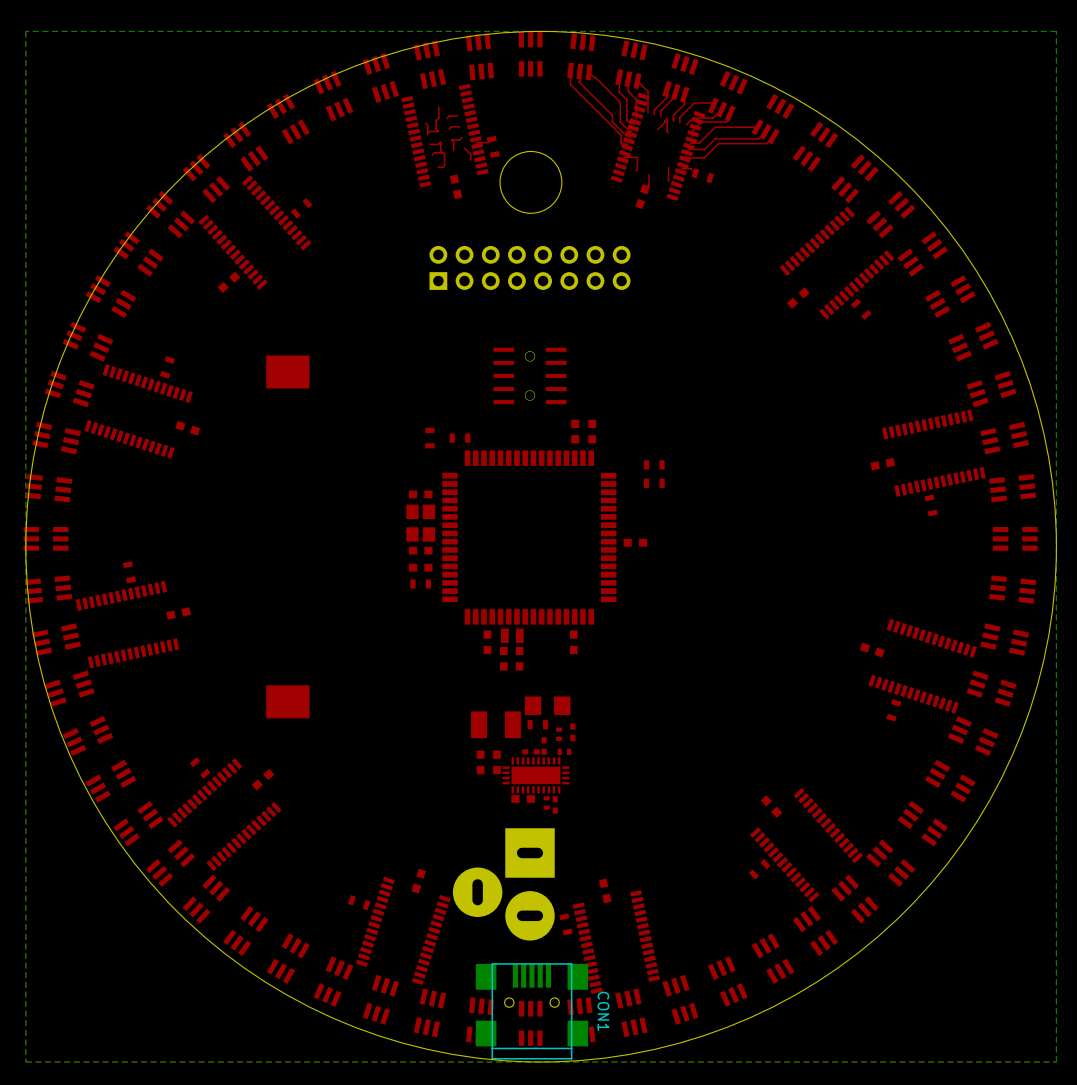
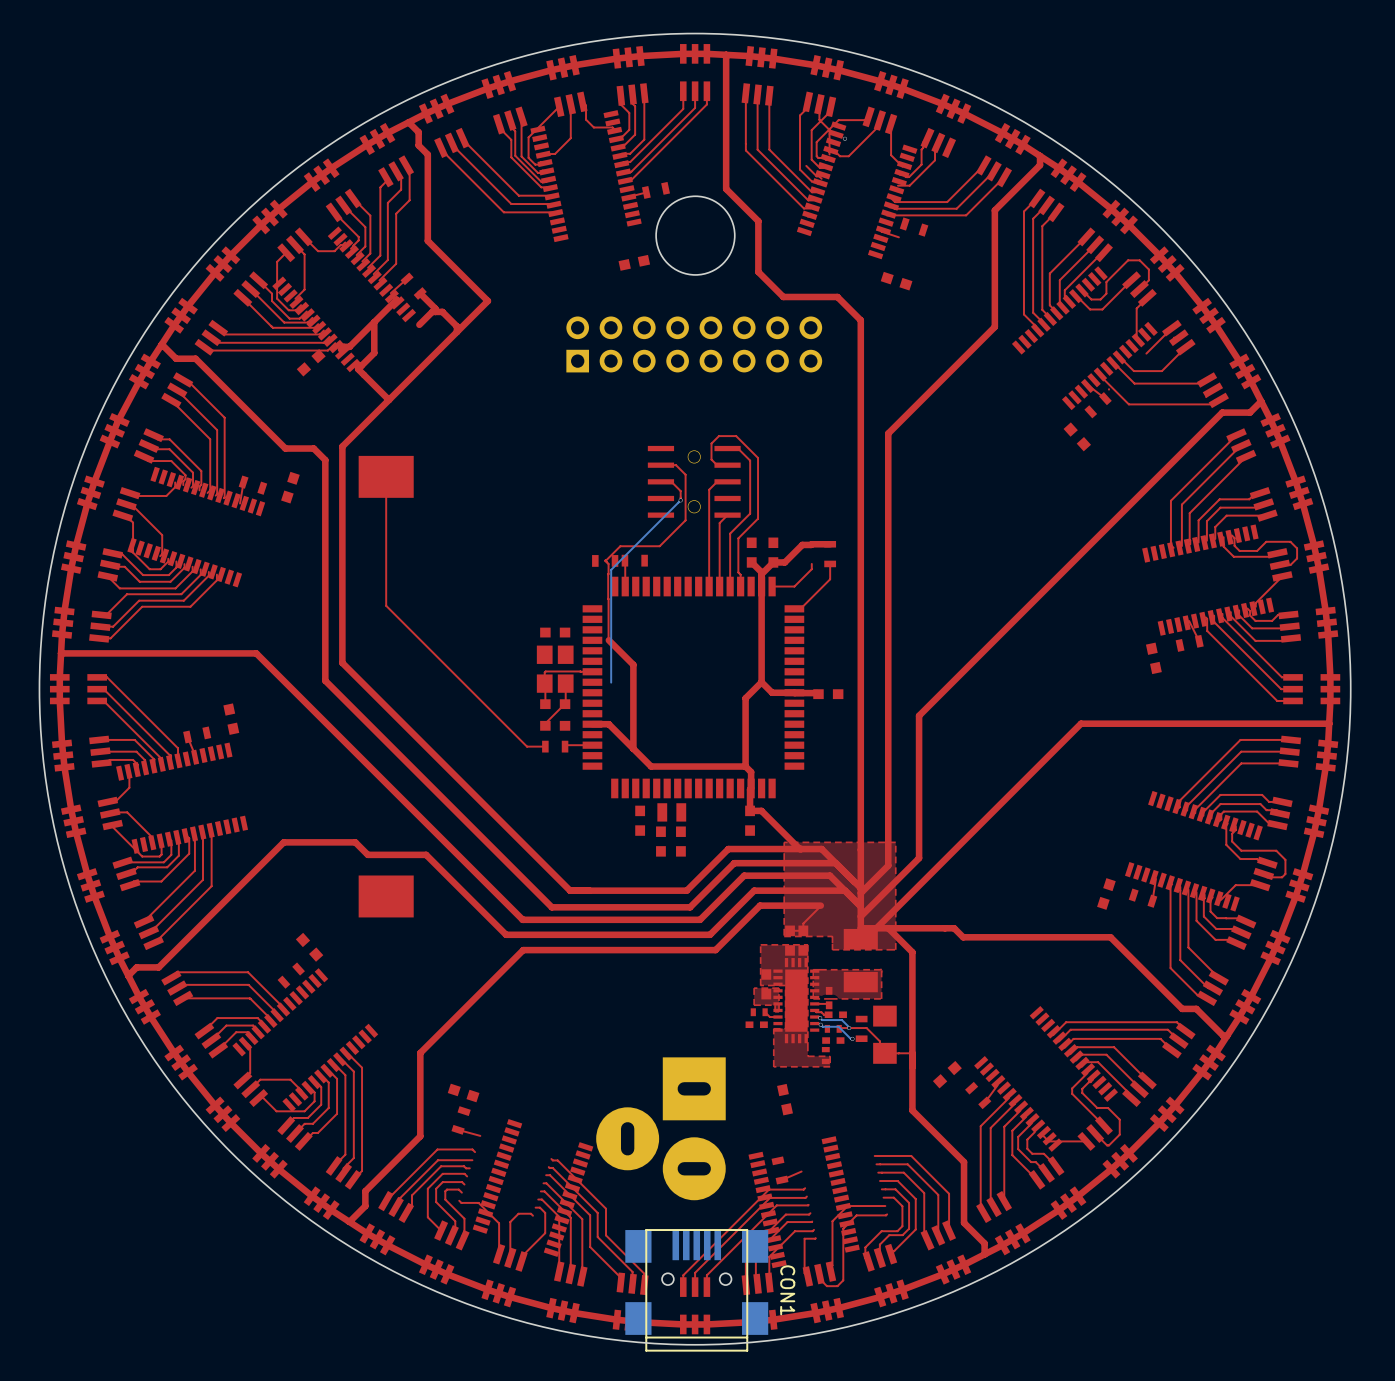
bottom zone outline: (1056, 31) (25, 31) (25, 1062) (1056, 1062) (1056, 31) -> none
top track: none -> (706, 53) (640, 56) (574, 65) (487, 88) (425, 113) (367, 144) (312, 182) (261, 224) (215, 272) (188, 306) (150, 361) (117, 422) (94, 481) (76, 545) (64, 611) (59, 677) (62, 743) (71, 809) (94, 896) (119, 958) (150, 1017) (188, 1072) (230, 1123) (278, 1169) (312, 1196) (367, 1233) (425, 1264) (487, 1289) (551, 1308) (616, 1319) (683, 1324) (749, 1322) (815, 1313) (902, 1289) (964, 1264) (1022, 1233) (1078, 1196) (1128, 1153) (1175, 1105) (1202, 1072) (1239, 1017) (1270, 958) (1295, 896) (1314, 832) (1325, 767) (1330, 700) (1328, 634) (1318, 568) (1295, 481) (1270, 419) (1239, 361) (1202, 306) (1159, 255) (1111, 209) (1078, 182) (1022, 144) (964, 113) (902, 88) (838, 70) (773, 58) (706, 53)
top track: none -> (726, 54) (726, 189) (758, 221) (758, 272) (783, 296) (837, 296) (860, 320) (860, 928) (954, 928) (963, 937) (1110, 937) (1182, 1008) (1196, 1008) (1223, 1035) (1227, 1035)
top track: none -> (683, 91) (683, 108) (630, 162) (622, 163)
top track: none -> (695, 91) (695, 107) (631, 171) (624, 171)
top track: none -> (706, 91) (706, 104) (631, 180) (625, 180)
top track: none -> (644, 93) (644, 139) (630, 153) (620, 155)
top track: none -> (632, 94) (632, 103) (635, 106) (635, 134) (622, 146) (618, 146)
top track: none -> (620, 95) (620, 104) (629, 112) (629, 129) (620, 138) (616, 138)
top track: (589, 72) (620, 102) (620, 122) (629, 131) (632, 131) -> (769, 95) (769, 149) (812, 192) (815, 192)
top track: none -> (582, 101) (586, 105) (586, 119) (593, 127) (612, 127) (615, 130)
top track: none -> (570, 104) (570, 138) (554, 153) (543, 153)
top track: none -> (559, 106) (528, 137) (528, 157) (535, 164) (545, 162)
top track: (579, 81) (612, 115) (612, 122) (618, 127) -> (757, 107) (757, 149) (808, 200) (813, 200)
top track: (619, 81) (619, 92) (626, 99) (626, 120) (634, 125) -> (807, 107) (800, 115) (800, 169) (811, 181) (818, 184)
top track: (637, 81) (648, 91) (648, 112) -> none
top track: (570, 84) (620, 135) (620, 142) (628, 144) -> (745, 111) (745, 150) (803, 208) (810, 208)
top track: none -> (830, 110) (811, 130) (811, 159) (819, 167) (823, 167)
top track: none -> (521, 116) (521, 156) (537, 172) (547, 170)
top track: (667, 89) (667, 97) (654, 110) (654, 114) -> (868, 116) (865, 120) (838, 120) (816, 142) (816, 156) (830, 159)
top track: none -> (510, 120) (510, 126) (515, 131) (515, 155) (541, 181) (546, 181) (549, 179)
top track: none -> (408, 122) (418, 132) (418, 145) (427, 154) (427, 240) (487, 301) (342, 446) (342, 662) (570, 890) (686, 890) (728, 849) (821, 849) (860, 888)
top track: none -> (499, 124) (499, 127) (511, 139) (511, 157) (541, 187) (550, 187)
top track: (675, 95) (660, 111) (660, 116) -> (879, 125) (848, 156) (839, 156) (835, 151) (828, 151)
top track: (684, 104) (673, 115) (673, 120) -> (891, 135) (891, 155) (902, 166)
top track: none -> (462, 138) (518, 195) (552, 195)
top track: (713, 105) (710, 103) (694, 103) (679, 117) (679, 123) -> (927, 138) (923, 142) (921, 149) (921, 164) (909, 177) (899, 174)
top track: (438, 106) (438, 118) (436, 120) (436, 129) (438, 131) (430, 131) (427, 133) (427, 125) (425, 123) -> none
via: none -> (844, 138)
top track: none -> (451, 142) (511, 204) (554, 204)
top track: (719, 112) (713, 118) (692, 118) (686, 125) -> (935, 146) (935, 160) (929, 165)
top track: none -> (441, 147) (503, 212) (556, 212)
top track: (727, 115) (726, 122) (701, 122) (692, 131) (692, 136) -> none
top track: (457, 116) (449, 116) (446, 118) -> none
top track: none -> (1040, 155) (1040, 165) (994, 210) (994, 326) (888, 433) (888, 865) (860, 893)
top track: (459, 126) (451, 126) (449, 129) -> none
top track: none -> (406, 165) (409, 168) (409, 200) (396, 213) (396, 263) (379, 280)
top track: (757, 127) (715, 127) -> (983, 165) (947, 202) (894, 202) (892, 199)
top track: (657, 129) (667, 118) (668, 132) -> none
top track: none -> (396, 171) (401, 176) (401, 189) (387, 202) (387, 260) (373, 274)
top track: none -> (385, 177) (385, 181) (380, 187) (380, 255) (368, 267)
top track: (462, 137) (459, 139) (451, 139) (453, 142) (453, 150) -> none
top track: (491, 139) (488, 142) (476, 142) -> none
top track: (758, 139) (715, 139) (704, 149) (688, 149) -> (984, 180) (956, 208) (889, 207)
top track: (766, 143) (718, 143) (704, 158) (688, 158) (685, 155) -> (995, 186) (966, 215) (886, 215)
top track: (430, 144) (438, 144) (440, 142) (440, 150) (444, 154) (444, 165) (437, 167) -> none
part rotation: 0° (493, 146) -> 90° clockwise (655, 190)
top track: (464, 148) (470, 154) (470, 160) -> none
top track: none -> (646, 192) (629, 196)
top track: (443, 152) (434, 152) (432, 155) -> none
top track: none -> (353, 198) (370, 215) (370, 253) (362, 261)
top track: none -> (1037, 198) (1023, 211) (1023, 314) (1038, 330)
top track: (623, 156) (637, 157) (636, 170) -> none
top track: none -> (343, 205) (365, 227) (365, 246) (356, 255)
top track: none -> (1042, 209) (1033, 218) (1033, 312) (1044, 324)
top track: none -> (334, 212) (358, 236) (358, 240) (350, 248)
top track: none -> (1056, 212) (1042, 226) (1042, 309) (1051, 318)
top track: (668, 167) (668, 180) -> none
top track: (681, 168) (690, 168) (695, 173) -> none
top track: (648, 174) (648, 185) (644, 189) -> none
top track: none -> (886, 231) (881, 231) (898, 237)
top track: none -> (303, 236) (318, 251) (334, 251) (345, 242)
top track: none -> (1086, 236) (1049, 273) (1049, 305) (1057, 313)
part rotation: 0° (456, 186) -> 90° clockwise (634, 262)
part position: (456, 186) -> (634, 262)
top track: none -> (295, 244) (304, 254) (304, 289) (295, 298)
top track: none -> (1095, 244) (1059, 280) (1059, 302) (1063, 307)
top track: none -> (286, 252) (277, 261) (277, 298) (288, 310) (295, 310) (301, 305)
top track: none -> (1103, 252) (1064, 290) (1064, 296) (1070, 301)
part rotation: 0° (642, 196) -> 90° clockwise (896, 281)
part position: (642, 196) -> (896, 281)
part rotation: 0° (301, 208) -> 90° clockwise (413, 286)
part position: (301, 208) -> (413, 286)
top track: none -> (407, 278) (390, 293)
top track: none -> (258, 280) (272, 293) (272, 301) (289, 318) (299, 318) (306, 311)
top track: none -> (1131, 280) (1102, 309) (1090, 309) (1076, 296)
top track: none -> (250, 289) (284, 322) (307, 322) (312, 317)
top track: none -> (1139, 289) (1148, 280) (1148, 269) (1139, 260) (1128, 260) (1106, 282) (1106, 293) (1100, 299) (1091, 299) (1082, 290)
top track: none -> (420, 293) (435, 308) (435, 311)
top track: none -> (242, 297) (271, 326)
top track: none -> (1147, 297) (1136, 308) (1136, 337) (1139, 340)
top track: none -> (396, 299) (349, 346) (343, 346) (341, 349)
top track: none -> (374, 322) (374, 353) (358, 369) (389, 399)
top track: none -> (318, 324) (314, 327) (271, 326)
top track: none -> (419, 324) (432, 311) (442, 311) (456, 326) (456, 332)
top track: none -> (218, 328) (224, 334) (319, 334) (323, 330)
top track: none -> (1171, 328) (1146, 353)
top track: none -> (329, 336) (323, 342) (216, 342) (211, 337)
top track: none -> (335, 343) (327, 350) (207, 350) (204, 347)
top track: none -> (161, 344) (176, 358) (195, 358) (285, 448) (313, 448) (325, 460) (325, 680) (551, 907) (690, 907) (734, 863) (835, 863)
top track: none -> (1185, 347) (1161, 371) (1133, 371) (1122, 360)
top track: none -> (1113, 362) (1134, 383) (1203, 383) (1207, 379)
top track: none -> (1101, 374) (1128, 404) (1211, 404) (1215, 400) (1218, 400)
top track: none -> (183, 379) (186, 379) (224, 417) (223, 498)
part rotation: 0° (798, 298) -> 90° clockwise (1077, 436)
part position: (798, 298) -> (1077, 436)
top track: none -> (1088, 385) (1105, 398)
top track: none -> (177, 390) (217, 430) (215, 495)
part rotation: 0° (861, 309) -> 90° clockwise (1098, 405)
part position: (861, 309) -> (1098, 405)
top track: none -> (171, 400) (210, 439) (210, 490) (207, 493)
top track: none -> (1261, 401) (1249, 412) (1222, 412) (919, 715) (919, 858) (860, 916)
top track: none -> (153, 435) (157, 439) (169, 439) (201, 471) (199, 490)
top track: none -> (1236, 435) (1170, 500) (1170, 545) (1173, 547)
top track: none -> (148, 445) (152, 449) (169, 449) (193, 472) (191, 487)
top track: none -> (1241, 445) (1181, 504) (1181, 546)
top track: none -> (727, 448) (738, 448) (750, 460) (750, 513) (730, 533) (730, 586)
top track: none -> (144, 456) (148, 461) (171, 461) (185, 475) (183, 485)
top track: none -> (1246, 456) (1189, 513) (1190, 544)
top track: none -> (660, 465) (676, 465) (685, 474) (685, 520) (659, 546) (620, 546) (605, 560) (608, 563) (608, 639) (633, 664) (633, 748)
top track: none -> (727, 465) (717, 465) (711, 459) (711, 443) (718, 436) (736, 436) (758, 457) (758, 518) (738, 538) (738, 572) (740, 574) (740, 586)
part rotation: 0° (167, 367) -> 90° clockwise (252, 485)
part position: (167, 367) -> (252, 485)
top track: none -> (386, 476) (386, 605) (527, 746) (545, 746)
top track: none -> (660, 481) (671, 481) (680, 491) (680, 500)
top track: none -> (727, 481) (717, 481) (709, 489) (709, 586)
top track: none -> (175, 482) (175, 487) (166, 495) (132, 495) (130, 493)
top track: none -> (243, 482) (240, 503)
top track: none -> (1260, 493) (1255, 493) (1249, 499) (1219, 499) (1198, 520) (1198, 542)
bottom track: none -> (680, 500) (611, 569) (611, 682)
via: none -> (680, 500)
top track: none -> (126, 504) (131, 504) (162, 535) (162, 554) (160, 556)
top track: none -> (1263, 504) (1259, 504) (1255, 507) (1220, 507) (1206, 521) (1206, 540)
top track: none -> (122, 515) (126, 515) (133, 522) (133, 552) (149, 569) (160, 569) (168, 561) (168, 558)
top track: none -> (727, 515) (719, 523) (719, 586)
top track: none -> (1267, 515) (1226, 515) (1215, 527) (1215, 539)
top track: none -> (1231, 535) (1234, 538) (1234, 545) (1239, 550) (1257, 550) (1266, 541) (1290, 541) (1297, 548) (1297, 558) (1290, 564) (1279, 564)
top track: none -> (1223, 537) (1223, 546) (1233, 556) (1269, 556) (1272, 553) (1277, 553)
top track: none -> (830, 544) (802, 544) (784, 562) (773, 562) (761, 574)
part rotation: 0° (187, 428) -> 90° clockwise (290, 487)
part position: (187, 428) -> (290, 487)
top track: none -> (112, 553) (122, 554) (143, 575) (168, 575) (176, 567) (176, 561)
part: none -> (830, 554)
top track: none -> (624, 560) (625, 586)
part rotation: 0° (429, 438) -> 90° clockwise (634, 560)
part position: (429, 438) -> (634, 560)
top track: none -> (751, 562) (761, 572) (761, 682)
top track: none -> (184, 564) (184, 567) (170, 581) (139, 581) (124, 566) (112, 566) (110, 564)
top track: none -> (811, 563) (811, 569) (794, 586) (772, 586)
top track: none -> (830, 563) (830, 579) (800, 608) (794, 608)
top track: none -> (192, 566) (192, 571) (175, 588) (119, 588) (107, 576)
top track: none -> (200, 569) (200, 574) (181, 594) (126, 594) (106, 614) (101, 614)
top track: none -> (208, 571) (208, 575) (183, 600) (139, 600) (113, 626) (100, 626)
top track: none -> (216, 574) (216, 580) (190, 606) (142, 606) (110, 638) (99, 638)
top track: none -> (1282, 576) (1255, 603) (1255, 606)
part: (654, 464) -> none
part rotation: 0° (882, 464) -> 90° clockwise (1153, 658)
part position: (882, 464) -> (1153, 658)
top track: none -> (1247, 608) (1250, 611) (1250, 615) (1255, 620) (1272, 620) (1278, 614) (1288, 614)
top track: none -> (1239, 610) (1239, 615) (1252, 628) (1288, 628) (1289, 626)
top track: none -> (1230, 612) (1230, 616) (1255, 640) (1283, 640) (1286, 638) (1290, 638)
top track: none -> (1222, 613) (1222, 617) (1281, 677) (1293, 677)
top track: none -> (1214, 615) (1214, 622) (1281, 689) (1293, 689)
top track: none -> (1205, 617) (1207, 630) (1277, 700) (1293, 700)
part: (654, 483) -> none
top track: none -> (1189, 620) (1199, 641)
part rotation: 0° (931, 505) -> 90° clockwise (1189, 643)
top track: none -> (61, 653) (256, 653) (522, 919) (700, 919) (744, 875) (829, 875) (860, 906)
top track: none -> (592, 671) (545, 671) (545, 704)
top track: none -> (97, 677) (107, 677) (178, 748) (179, 760)
top track: none -> (761, 682) (745, 698) (745, 766)
top track: none -> (761, 682) (772, 692) (818, 694)
top track: none -> (565, 683) (565, 703) (545, 723) (545, 725)
top track: none -> (97, 689) (103, 689) (171, 755) (171, 762)
round board edge position: (541, 546) -> (695, 689)
top track: none -> (97, 700) (103, 700) (162, 759) (162, 764)
top track: none -> (592, 724) (608, 724) (651, 766) (745, 766)
top track: none -> (1329, 723) (1081, 723) (876, 928)
part rotation: 0° (129, 572) -> 90° clockwise (197, 734)
top track: none -> (187, 737) (196, 757)
top track: none -> (99, 739) (134, 739) (154, 759) (154, 766)
top track: none -> (1290, 739) (1240, 739) (1179, 800) (1179, 807)
top track: none -> (592, 745) (565, 746)
top track: none -> (100, 751) (136, 751) (144, 759) (146, 768)
top track: none -> (1289, 751) (1241, 751) (1187, 805) (1187, 810)
top track: none -> (101, 763) (106, 763) (109, 759) (133, 759) (137, 764) (137, 769)
top track: none -> (1288, 763) (1241, 763) (1195, 809) (1195, 813)
top track: none -> (745, 766) (751, 772) (750, 810) (761, 810) (799, 849)
top track: none -> (129, 771) (129, 787) (115, 801) (107, 801)
part rotation: 0° (178, 613) -> 90° clockwise (231, 719)
part position: (178, 613) -> (231, 719)
top track: none -> (1282, 801) (1269, 801) (1262, 794) (1220, 794) (1203, 812) (1203, 815)
top track: none -> (110, 813) (127, 812) (152, 837) (153, 842)
top track: none -> (1279, 813) (1276, 810) (1266, 810) (1260, 804) (1220, 804) (1211, 813) (1211, 818)
top track: none -> (1219, 821) (1223, 811) (1257, 811) (1270, 825) (1277, 825)
top track: none -> (1227, 823) (1226, 844) (1240, 859) (1257, 859) (1260, 862) (1267, 862)
top track: none -> (112, 825) (142, 856) (159, 856) (161, 854) (161, 841)
top track: none -> (1235, 826) (1235, 830) (1232, 833) (1232, 841) (1241, 850) (1276, 850) (1285, 859) (1285, 874) (1282, 877) (1267, 877) (1263, 873)
top track: none -> (211, 830) (211, 886) (153, 943)
part rotation: 0° (872, 650) -> 90° clockwise (1106, 894)
part position: (872, 650) -> (1106, 894)
top track: none -> (203, 832) (203, 879) (148, 932)
top track: none -> (194, 834) (194, 870) (144, 921)
top track: none -> (186, 835) (189, 838) (189, 853) (161, 881) (133, 881) (130, 885)
top track: none -> (178, 837) (178, 855) (167, 867) (137, 867) (131, 873) (126, 873)
top track: none -> (169, 839) (171, 854) (163, 862) (122, 862)
top zone outline: none -> (895, 842) (895, 949) (832, 949) (832, 936) (784, 936) (784, 842) (895, 842)
top track: none -> (1155, 878) (1152, 901)
top track: none -> (1172, 884) (1170, 885) (1170, 968) (1197, 995) (1203, 995) (1207, 998)
top track: none -> (1260, 885) (1235, 885) (1220, 900)
top track: none -> (1180, 886) (1180, 960) (1208, 988) (1212, 988)
top track: none -> (1188, 889) (1188, 947) (1218, 977)
top track: none -> (844, 890) (754, 890) (710, 934) (506, 934) (426, 854) (367, 854) (355, 842) (283, 842) (158, 967) (136, 967) (128, 975)
top track: none -> (1196, 892) (1196, 920) (1215, 939) (1233, 939) (1236, 943)
top track: none -> (1204, 894) (1203, 916) (1216, 928) (1237, 928) (1241, 932)
top track: none -> (1212, 897) (1210, 899) (1210, 911) (1217, 918) (1225, 918)
part rotation: 0° (547, 705) -> 90° clockwise (884, 1034)
part position: (547, 705) -> (884, 1034)
part rotation: 0° (893, 710) -> 90° clockwise (1143, 898)
top track: none -> (1226, 918) (1242, 918) (1246, 921)
part rotation: 0° (495, 724) -> 90° clockwise (860, 960)
part position: (495, 724) -> (860, 960)
part: (537, 724) -> none
top track: none -> (888, 928) (912, 952) (912, 1110) (964, 1162) (964, 1222) (984, 1243) (984, 1254)
top track: none -> (790, 930) (803, 930) (803, 923) (820, 905) (760, 905) (715, 950) (523, 950) (420, 1053) (420, 1136) (365, 1191) (365, 1206) (348, 1221)
part: (572, 732) -> none
part: (559, 734) -> none
part: none -> (790, 940)
part: none -> (803, 940)
top zone outline: none -> (807, 944) (807, 1056) (830, 1056) (830, 1066) (773, 1066) (773, 1028) (785, 1028) (785, 985) (760, 985) (760, 944) (807, 944)
part: (544, 745) -> none
part: (530, 751) -> none
part: (564, 751) -> none
top zone outline: none -> (881, 968) (881, 998) (813, 998) (813, 969) (881, 968)
part: (480, 762) -> none
part: (496, 762) -> none
top track: none -> (171, 977) (177, 972) (248, 972) (285, 1009)
part rotation: 0° (200, 767) -> 90° clockwise (291, 975)
part position: (200, 767) -> (291, 975)
part: none -> (766, 984)
top track: none -> (177, 988) (180, 984) (248, 984) (279, 1015)
top zone outline: none -> (779, 988) (779, 1011) (775, 1011) (775, 1005) (754, 1005) (754, 988) (779, 988)
part rotation: 0° (535, 775) -> 90° clockwise (796, 1000)
part position: (535, 775) -> (796, 1000)
part rotation: 0° (263, 779) -> 90° clockwise (309, 947)
part position: (263, 779) -> (309, 947)
top track: none -> (183, 998) (250, 998)
part: none -> (829, 998)
top track: none -> (250, 998) (272, 1021)
top track: none -> (814, 1003) (829, 1005)
top track: none -> (814, 1010) (828, 1014)
part: none -> (759, 1012)
top track: none -> (765, 1012) (769, 1017) (777, 1017)
part: none -> (835, 1014)
bottom track: none -> (820, 1018) (822, 1020) (841, 1020) (849, 1028)
via: none -> (820, 1018)
part: (523, 799) -> none
part: (546, 802) -> none
bottom track: none -> (820, 1024) (822, 1026) (838, 1026) (852, 1038)
via: none -> (820, 1024)
top track: none -> (266, 1026) (257, 1018) (217, 1018) (204, 1031)
part rotation: 0° (555, 804) -> 90° clockwise (756, 1024)
part position: (555, 804) -> (756, 1024)
part: none -> (833, 1028)
top track: none -> (839, 1028) (866, 1028) (879, 1041) (879, 1048) (884, 1053) (912, 1053)
via: none -> (849, 1028)
part: none -> (861, 1028)
part rotation: 0° (771, 806) -> 90° clockwise (947, 1074)
part position: (771, 806) -> (947, 1074)
top track: none -> (1185, 1031) (1176, 1022) (1066, 1022) (1053, 1035)
top track: none -> (260, 1032) (253, 1025) (226, 1025) (211, 1040)
top track: none -> (253, 1038) (247, 1032) (236, 1032) (218, 1050)
via: none -> (852, 1038)
part: none -> (833, 1040)
top track: none -> (1178, 1040) (1167, 1029) (1070, 1029) (1058, 1041)
top track: none -> (247, 1044) (250, 1046) (250, 1073) (242, 1080)
top track: none -> (1064, 1047) (1073, 1038) (1160, 1038) (1171, 1050)
top track: none -> (348, 1053) (362, 1067) (362, 1170) (353, 1179)
top track: none -> (1070, 1054) (1077, 1047) (1114, 1047) (1147, 1080)
part: none -> (825, 1055)
top track: none -> (341, 1059) (353, 1071) (353, 1158) (343, 1168) (343, 1172)
top track: none -> (1076, 1060) (1081, 1054) (1106, 1054) (1139, 1089)
top track: none -> (335, 1065) (345, 1075) (345, 1154) (334, 1165)
top track: none -> (1081, 1066) (1086, 1062) (1098, 1062) (1131, 1098)
top track: none -> (329, 1071) (337, 1078) (337, 1113) (317, 1132) (312, 1132) (303, 1141)
top track: none -> (1087, 1073) (1072, 1088) (1072, 1093) (1103, 1125)
top track: none -> (322, 1076) (328, 1082) (328, 1107) (312, 1123) (304, 1123) (295, 1133)
top track: none -> (1093, 1079) (1082, 1088) (1082, 1093) (1097, 1107) (1108, 1107) (1119, 1119) (1119, 1134) (1108, 1145) (1095, 1133)
top track: none -> (316, 1082) (321, 1087) (321, 1104) (307, 1117) (293, 1117) (286, 1125)
top track: none -> (997, 1085) (984, 1102)
top track: none -> (310, 1088) (314, 1092) (314, 1101) (304, 1111) (276, 1111) (263, 1098) (258, 1098)
top track: none -> (250, 1089) (260, 1079) (290, 1079) (303, 1093)
top track: none -> (1009, 1097) (980, 1126) (980, 1209) (983, 1212)
top track: none -> (1014, 1104) (990, 1127) (990, 1203) (994, 1206)
part rotation: 0° (759, 869) -> 90° clockwise (978, 1095)
top track: none -> (1020, 1110) (1004, 1126) (1004, 1201)
top track: none -> (1026, 1116) (1012, 1130) (1012, 1155) (1037, 1179)
top track: none -> (1031, 1123) (1018, 1136) (1018, 1149) (1031, 1162) (1035, 1162) (1046, 1172)
part rotation: 0° (418, 881) -> 90° clockwise (463, 1093)
part position: (418, 881) -> (463, 1093)
top track: none -> (458, 1129) (480, 1135)
top track: none -> (1034, 1132) (1027, 1139) (1027, 1148) (1032, 1153) (1043, 1153) (1056, 1165)
top track: none -> (1043, 1135) (1048, 1141) (1086, 1141)
part position: (605, 890) -> (785, 1099)
top track: none -> (475, 1152) (472, 1149) (437, 1149) (385, 1201)
part rotation: 0° (359, 902) -> 90° clockwise (461, 1120)
part position: (359, 902) -> (461, 1120)
top track: none -> (874, 1155) (911, 1155) (949, 1193) (949, 1230)
top track: none -> (551, 1159) (557, 1160) (606, 1208) (606, 1235) (644, 1273) (644, 1285)
top track: none -> (472, 1160) (438, 1160) (400, 1197) (400, 1202) (396, 1206)
top track: none -> (876, 1164) (907, 1164) (938, 1194) (938, 1235)
top track: none -> (548, 1167) (552, 1167) (597, 1212) (597, 1237) (632, 1271) (632, 1283)
top track: none -> (469, 1168) (464, 1166) (441, 1166) (411, 1195) (411, 1207) (406, 1212)
top track: none -> (801, 1171) (782, 1180)
top track: none -> (878, 1172) (903, 1172) (924, 1193) (924, 1236) (927, 1240)
top track: none -> (546, 1175) (549, 1175) (590, 1215) (590, 1247) (620, 1277) (620, 1282)
top track: none -> (467, 1176) (464, 1173) (442, 1173) (427, 1188) (427, 1217) (441, 1230)
part position: (565, 924) -> (780, 1170)
top track: none -> (880, 1181) (897, 1181) (915, 1199) (915, 1229) (891, 1254)
top track: none -> (543, 1183) (546, 1183) (582, 1219) (582, 1276)
top track: none -> (464, 1184) (462, 1182) (442, 1182) (436, 1188) (436, 1202) (455, 1221) (451, 1235)
top track: none -> (805, 1188) (769, 1189) (683, 1275) (683, 1287)
top track: none -> (881, 1189) (895, 1189) (909, 1202) (909, 1228) (902, 1235) (889, 1235) (879, 1244) (879, 1257)
top track: none -> (540, 1191) (544, 1191) (570, 1217) (570, 1274)
top track: none -> (461, 1192) (458, 1189) (446, 1189) (445, 1199) (464, 1218) (462, 1240)
top track: none -> (806, 1196) (770, 1197) (695, 1272) (695, 1287)
top track: none -> (883, 1197) (893, 1197) (902, 1206) (902, 1226) (897, 1231) (881, 1231) (865, 1247) (865, 1258) (868, 1261)
top track: none -> (538, 1199) (541, 1199) (559, 1216) (559, 1271)
top track: none -> (459, 1200) (461, 1202) (478, 1202) (499, 1223) (499, 1254)
top track: none -> (808, 1204) (776, 1205) (706, 1275) (706, 1287)
top track: none -> (885, 1206) (847, 1206) (832, 1221) (830, 1271)
top track: none -> (535, 1207) (539, 1207) (545, 1212) (545, 1233) (521, 1256) (521, 1261)
top track: none -> (810, 1213) (785, 1214) (745, 1254) (745, 1285)
top track: none -> (887, 1214) (856, 1215) (843, 1228) (843, 1280) (837, 1286) (826, 1286) (819, 1278) (819, 1274)
top track: none -> (532, 1215) (530, 1213) (518, 1213) (510, 1221) (510, 1257)
top track: none -> (812, 1221) (787, 1222) (755, 1253) (757, 1283)
top track: none -> (814, 1229) (795, 1231) (769, 1257)
top track: none -> (815, 1238) (804, 1238) (804, 1273) (807, 1276)
top track: none -> (769, 1257) (769, 1282)

